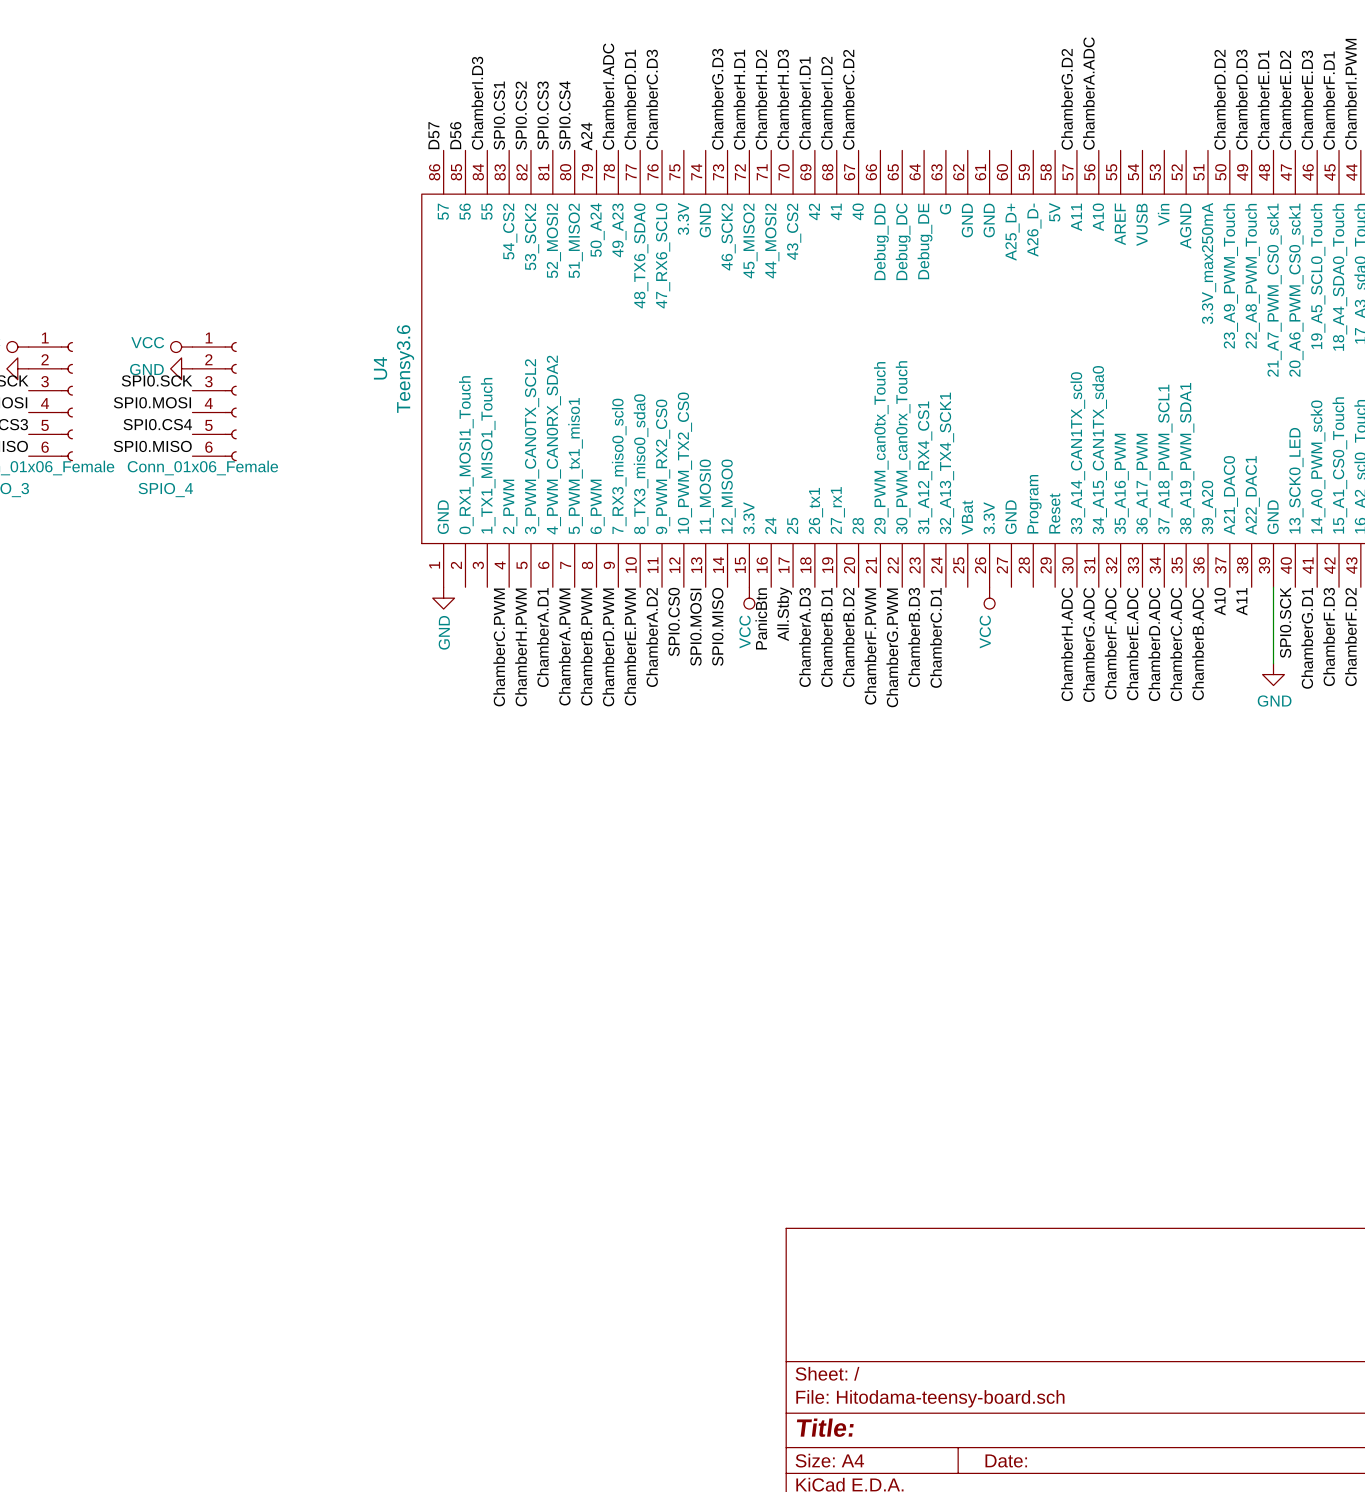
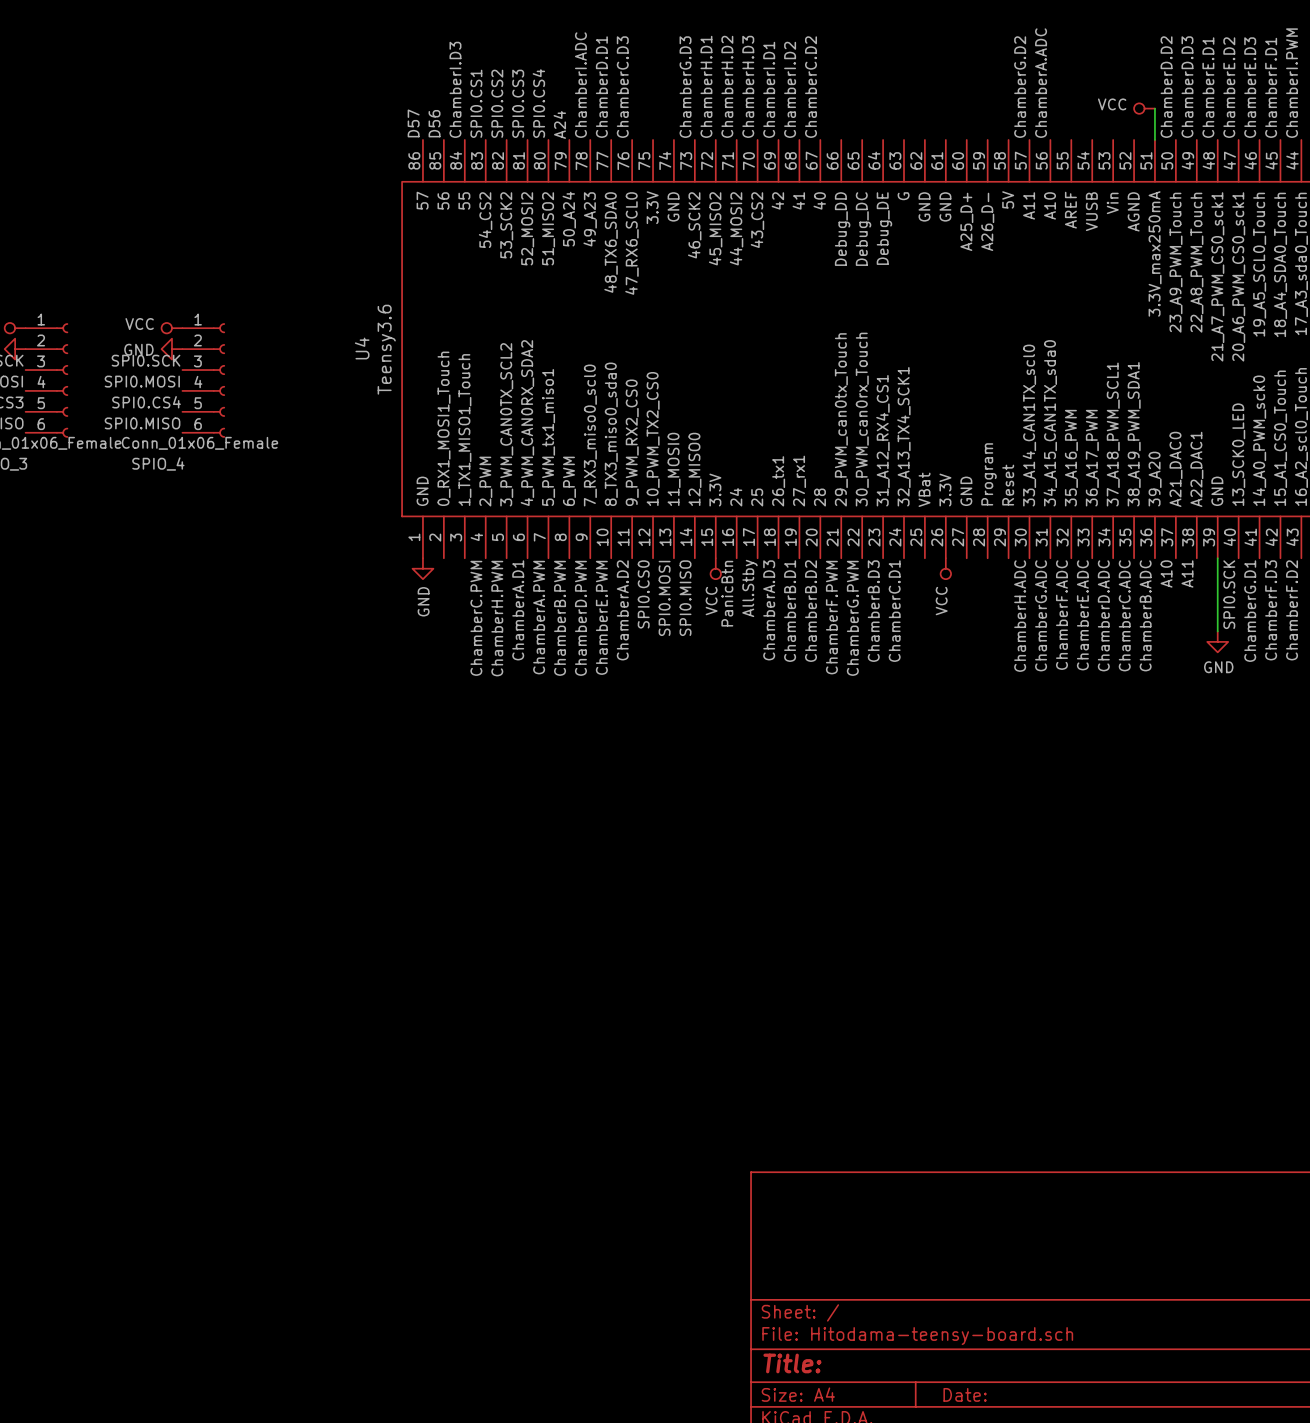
power symbol: none -> VCC (1144, 108)
wire: none -> (1154, 108) (1154, 139)

